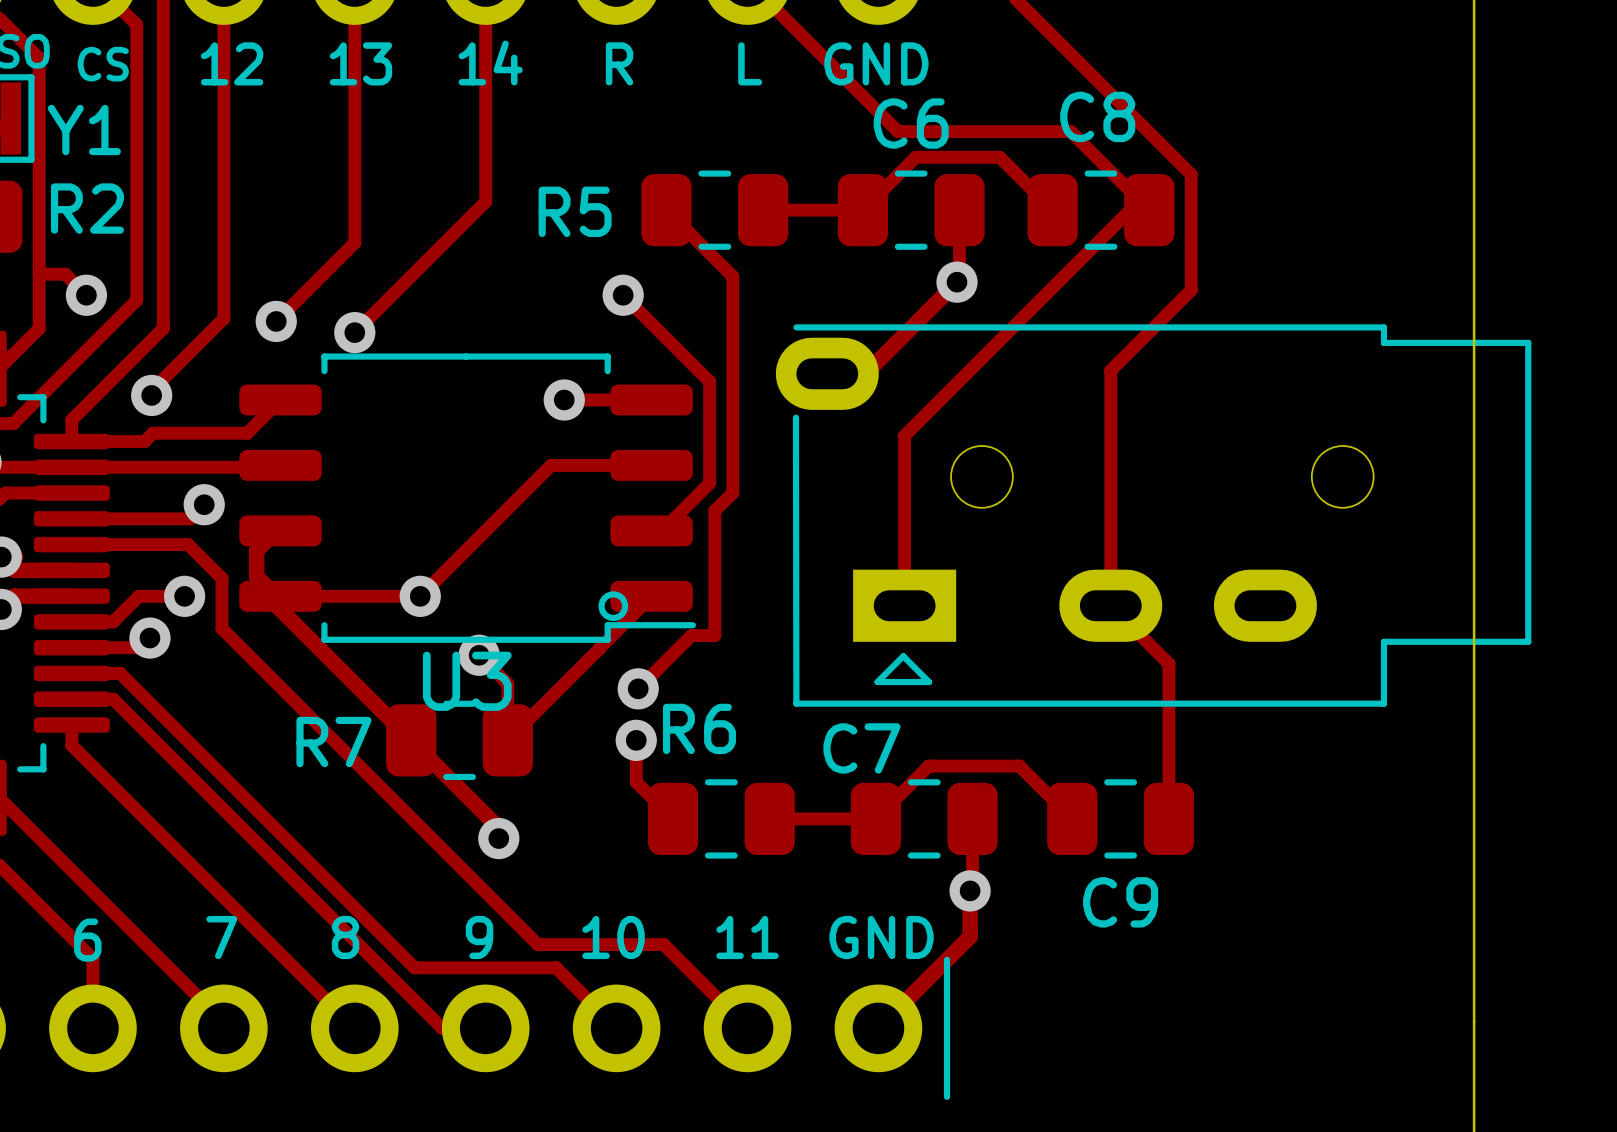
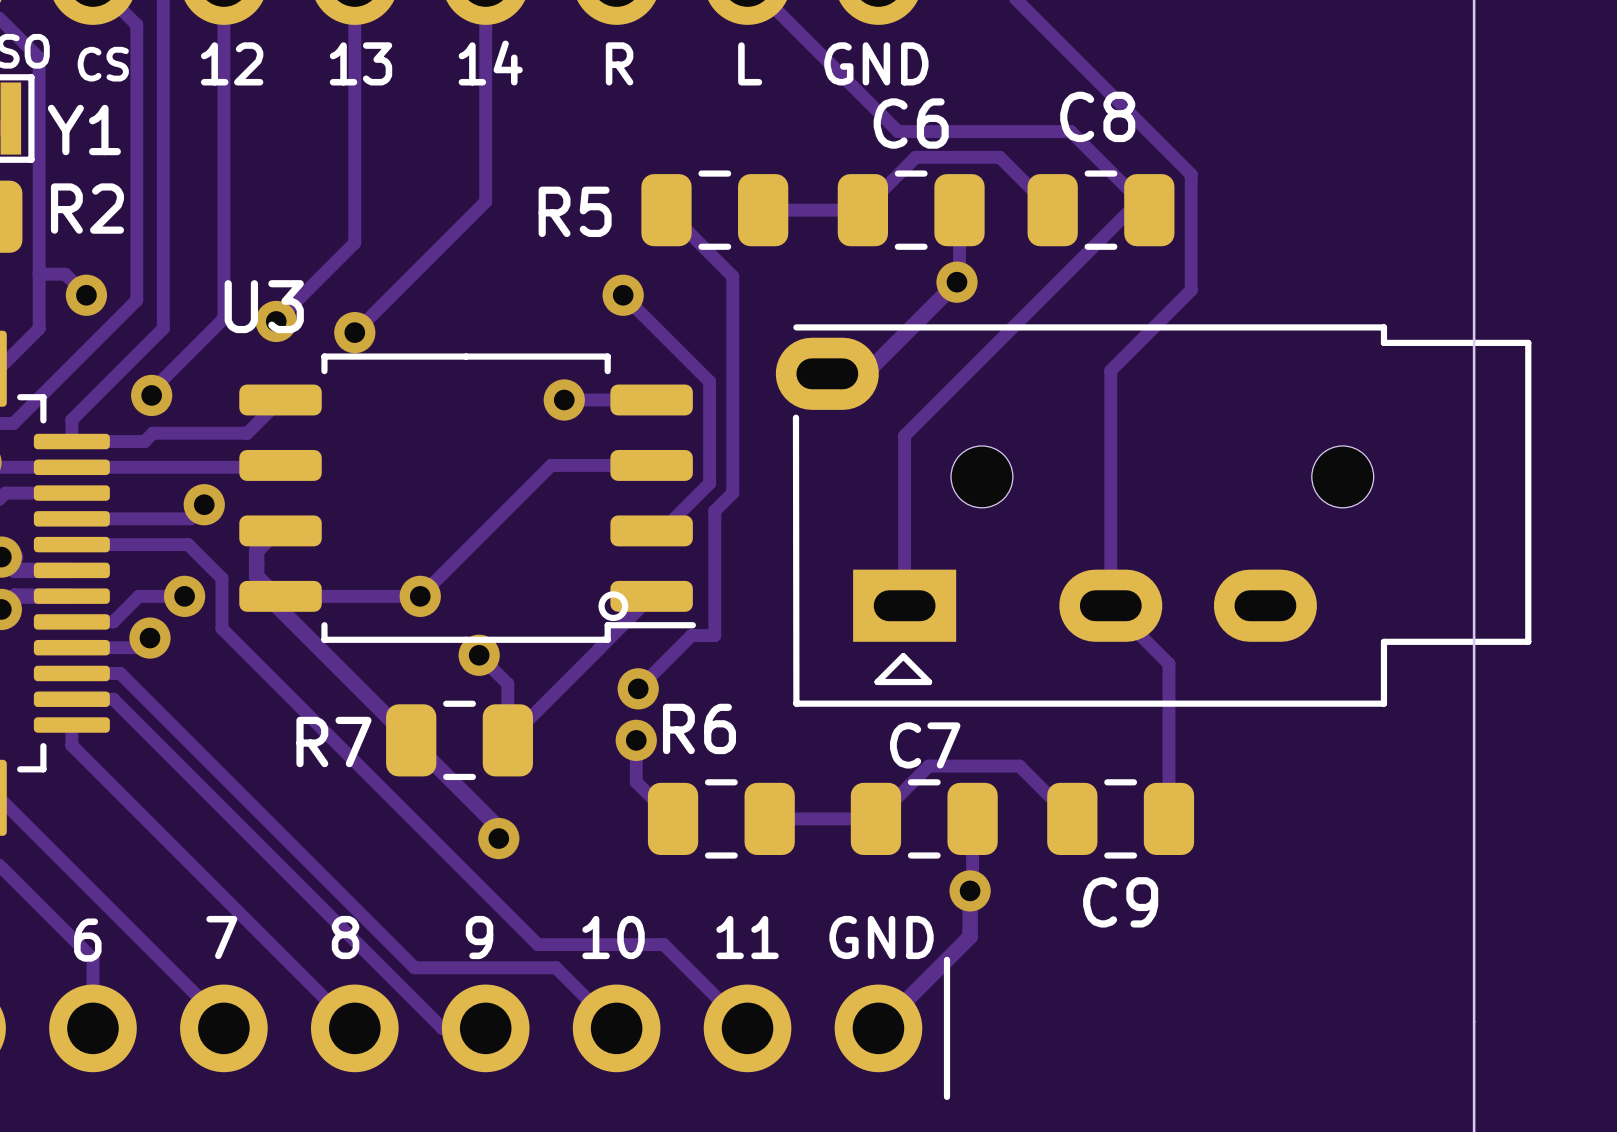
U3 name position: U3 (467, 681) -> U3 (264, 306)
C7 name position: C7 (861, 748) -> C7 (925, 745)

